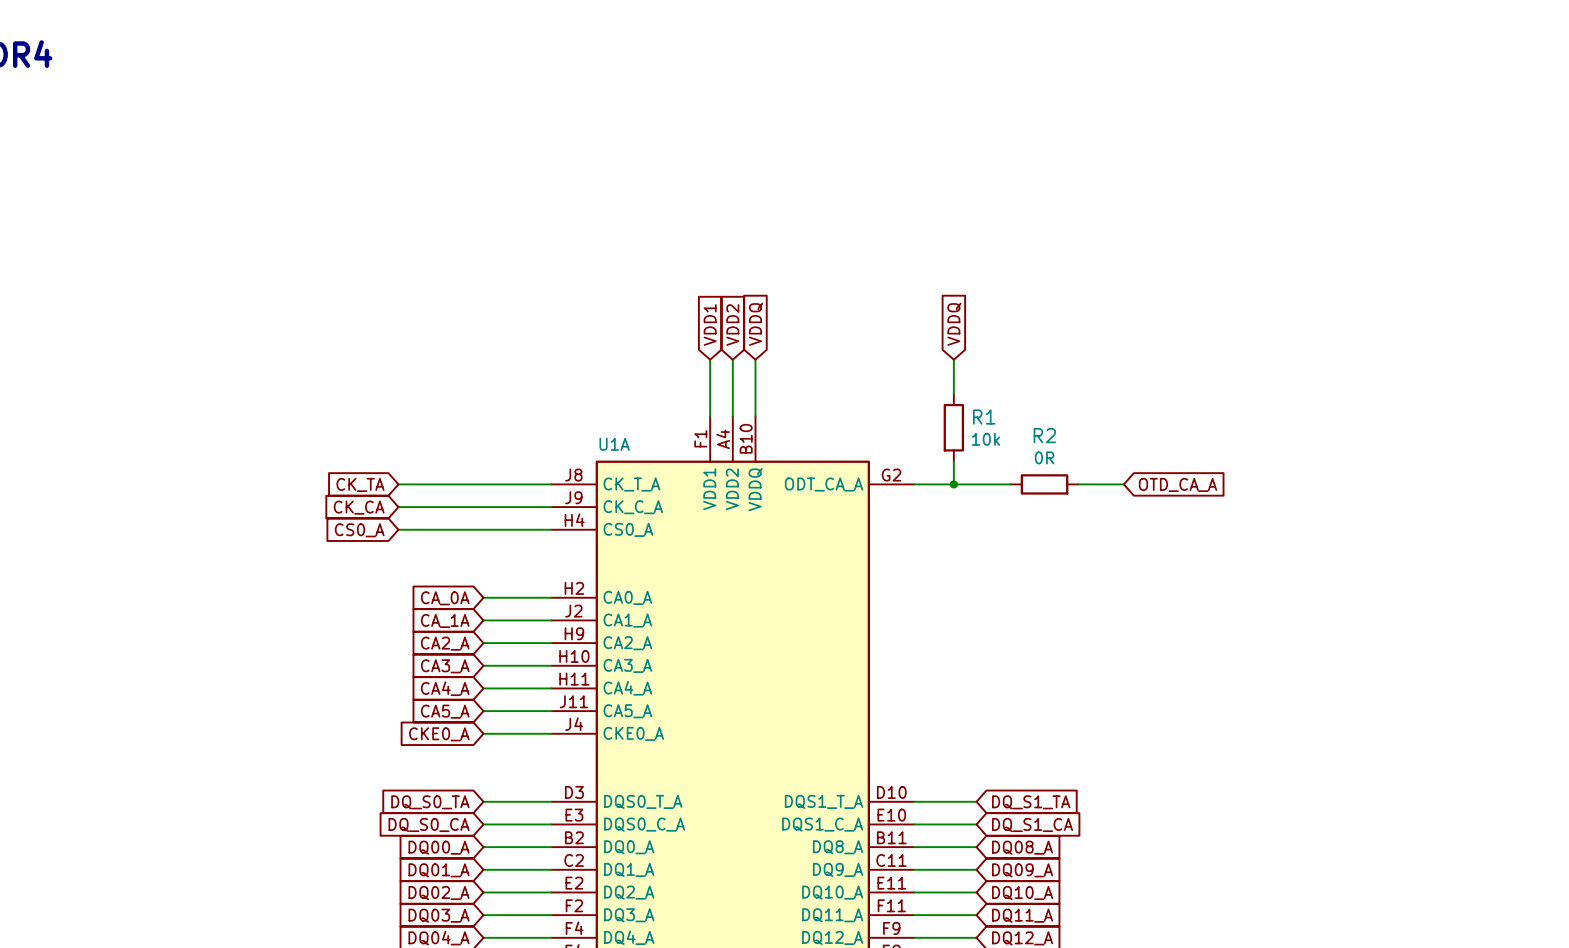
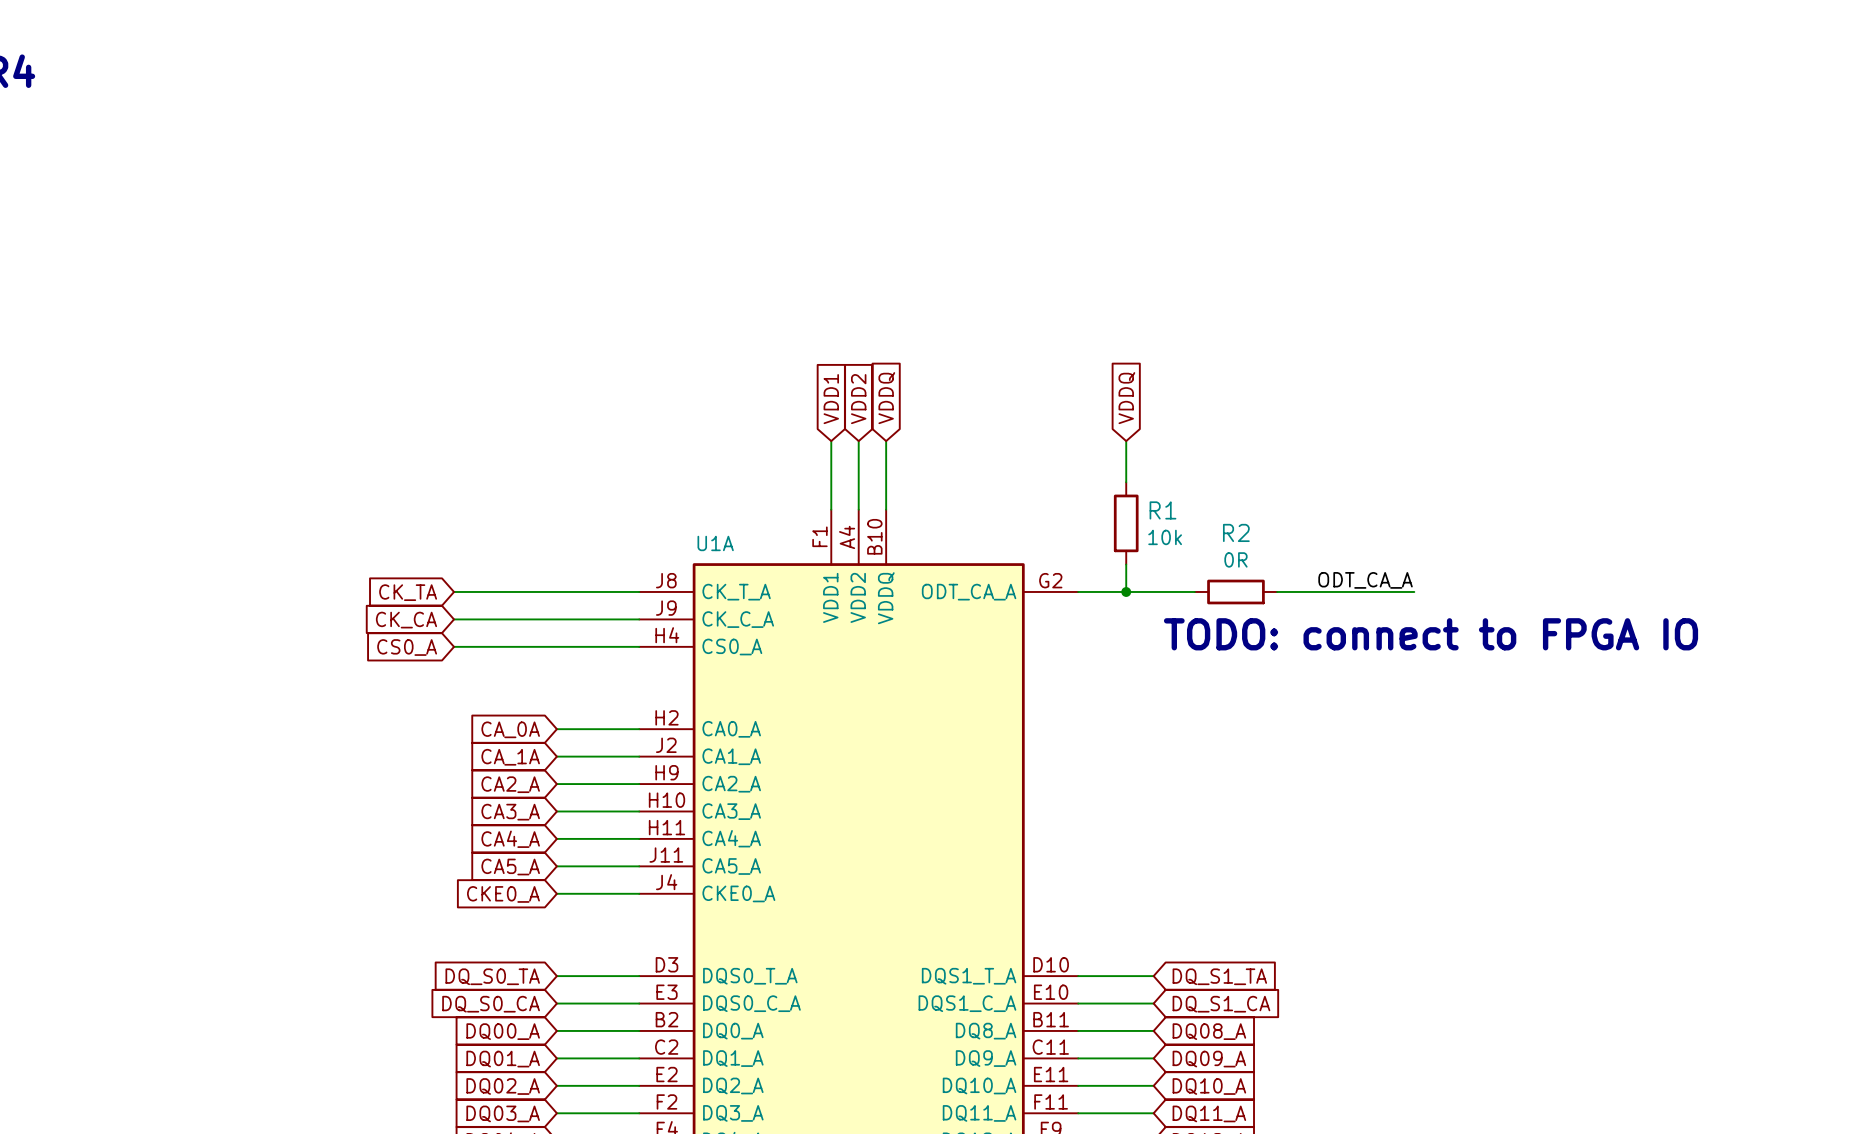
label: none -> ODT_CA_A (1365, 580)
wire: none -> (1332, 591) (1414, 591)
global label: OTD_CA_A (1178, 484) -> none
text: none -> TODO: connect to FPGA IO (1431, 634)

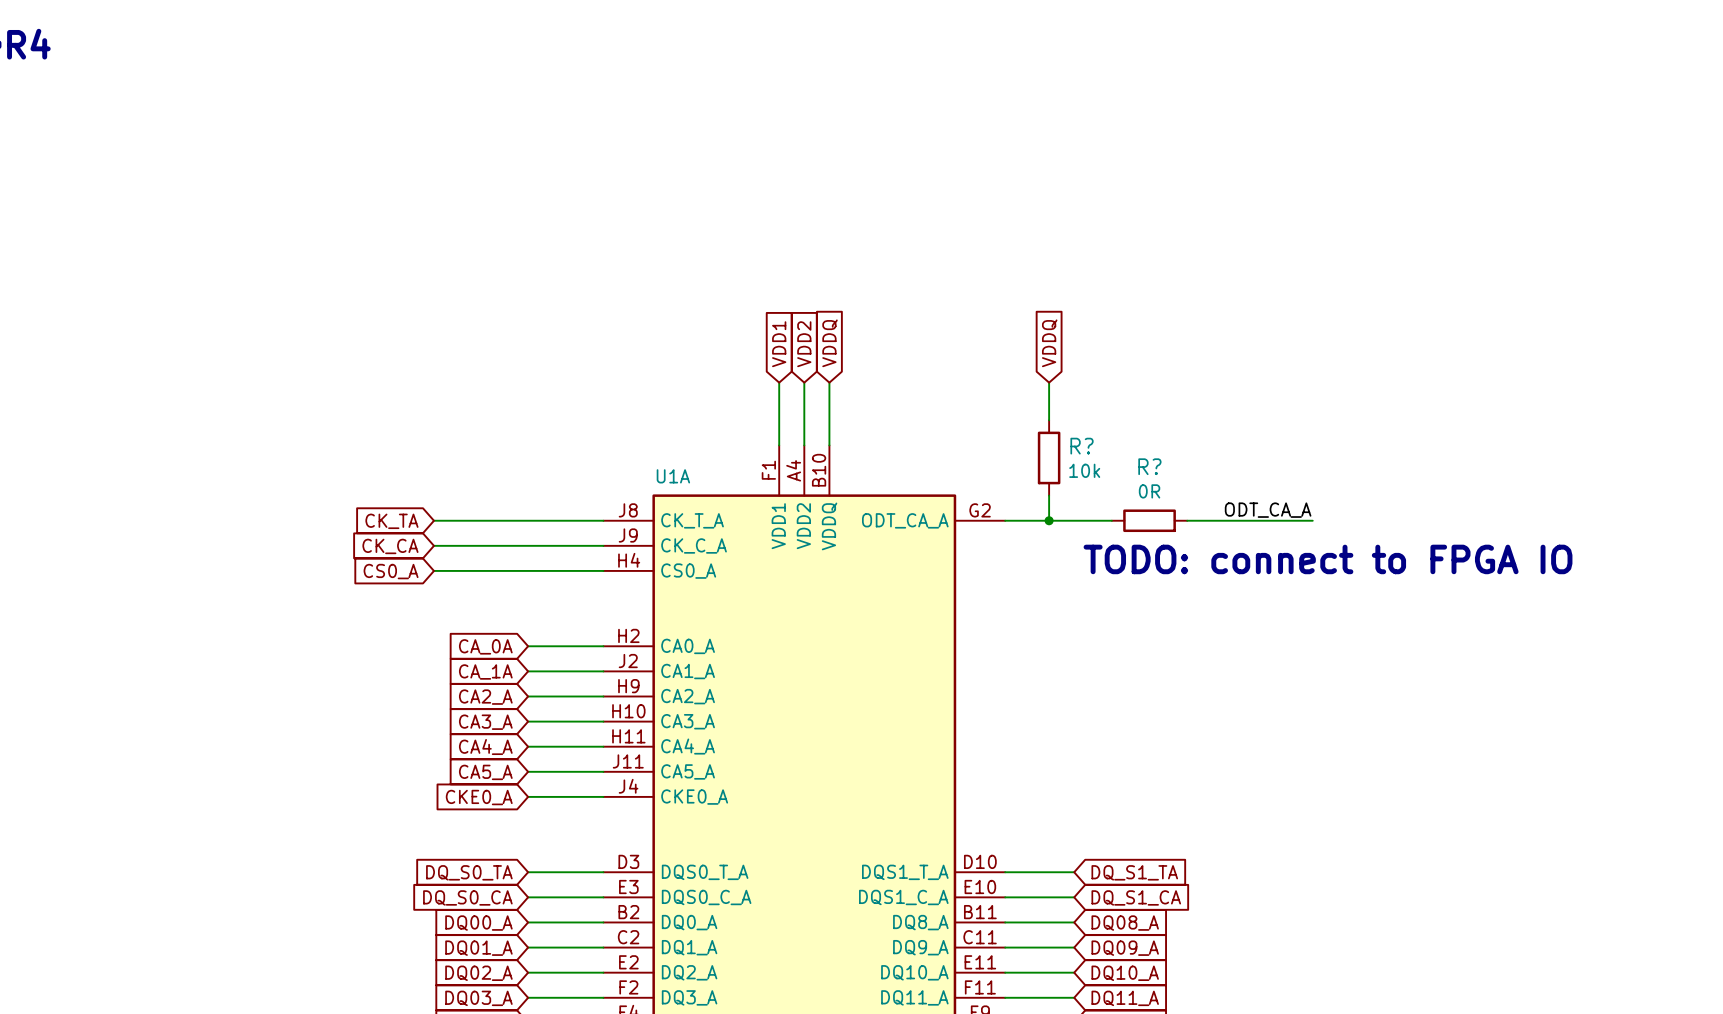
R1 name: R1 (1162, 510) -> R? (1082, 446)
R2 name: R2 (1236, 532) -> R? (1149, 466)

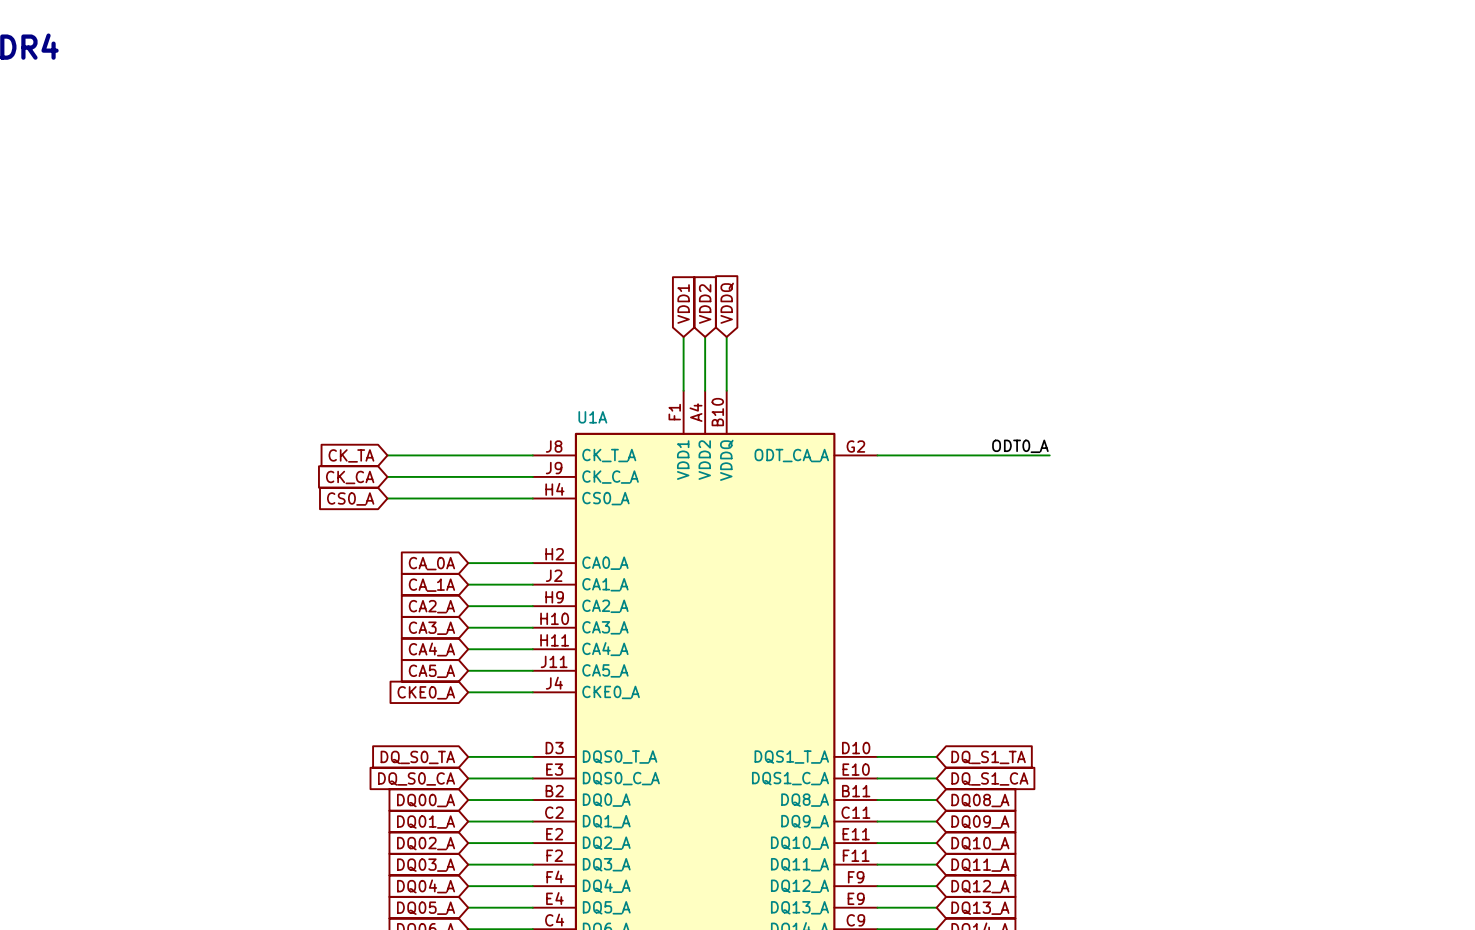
global label: VDDQ (1049, 343) -> none
wire: (1049, 382) (1049, 420) -> none
R?: (1049, 457) -> none
wire: (1049, 495) (1049, 520) -> none
label: ODT_CA_A (1268, 510) -> ODT0_A (1020, 446)
junction: (1049, 520) -> none
wire: none -> (968, 455) (1033, 455)
R?: (1149, 520) -> none
wire: (1206, 520) (1312, 520) -> none
text: TODO: connect to FPGA IO (1328, 559) -> none

